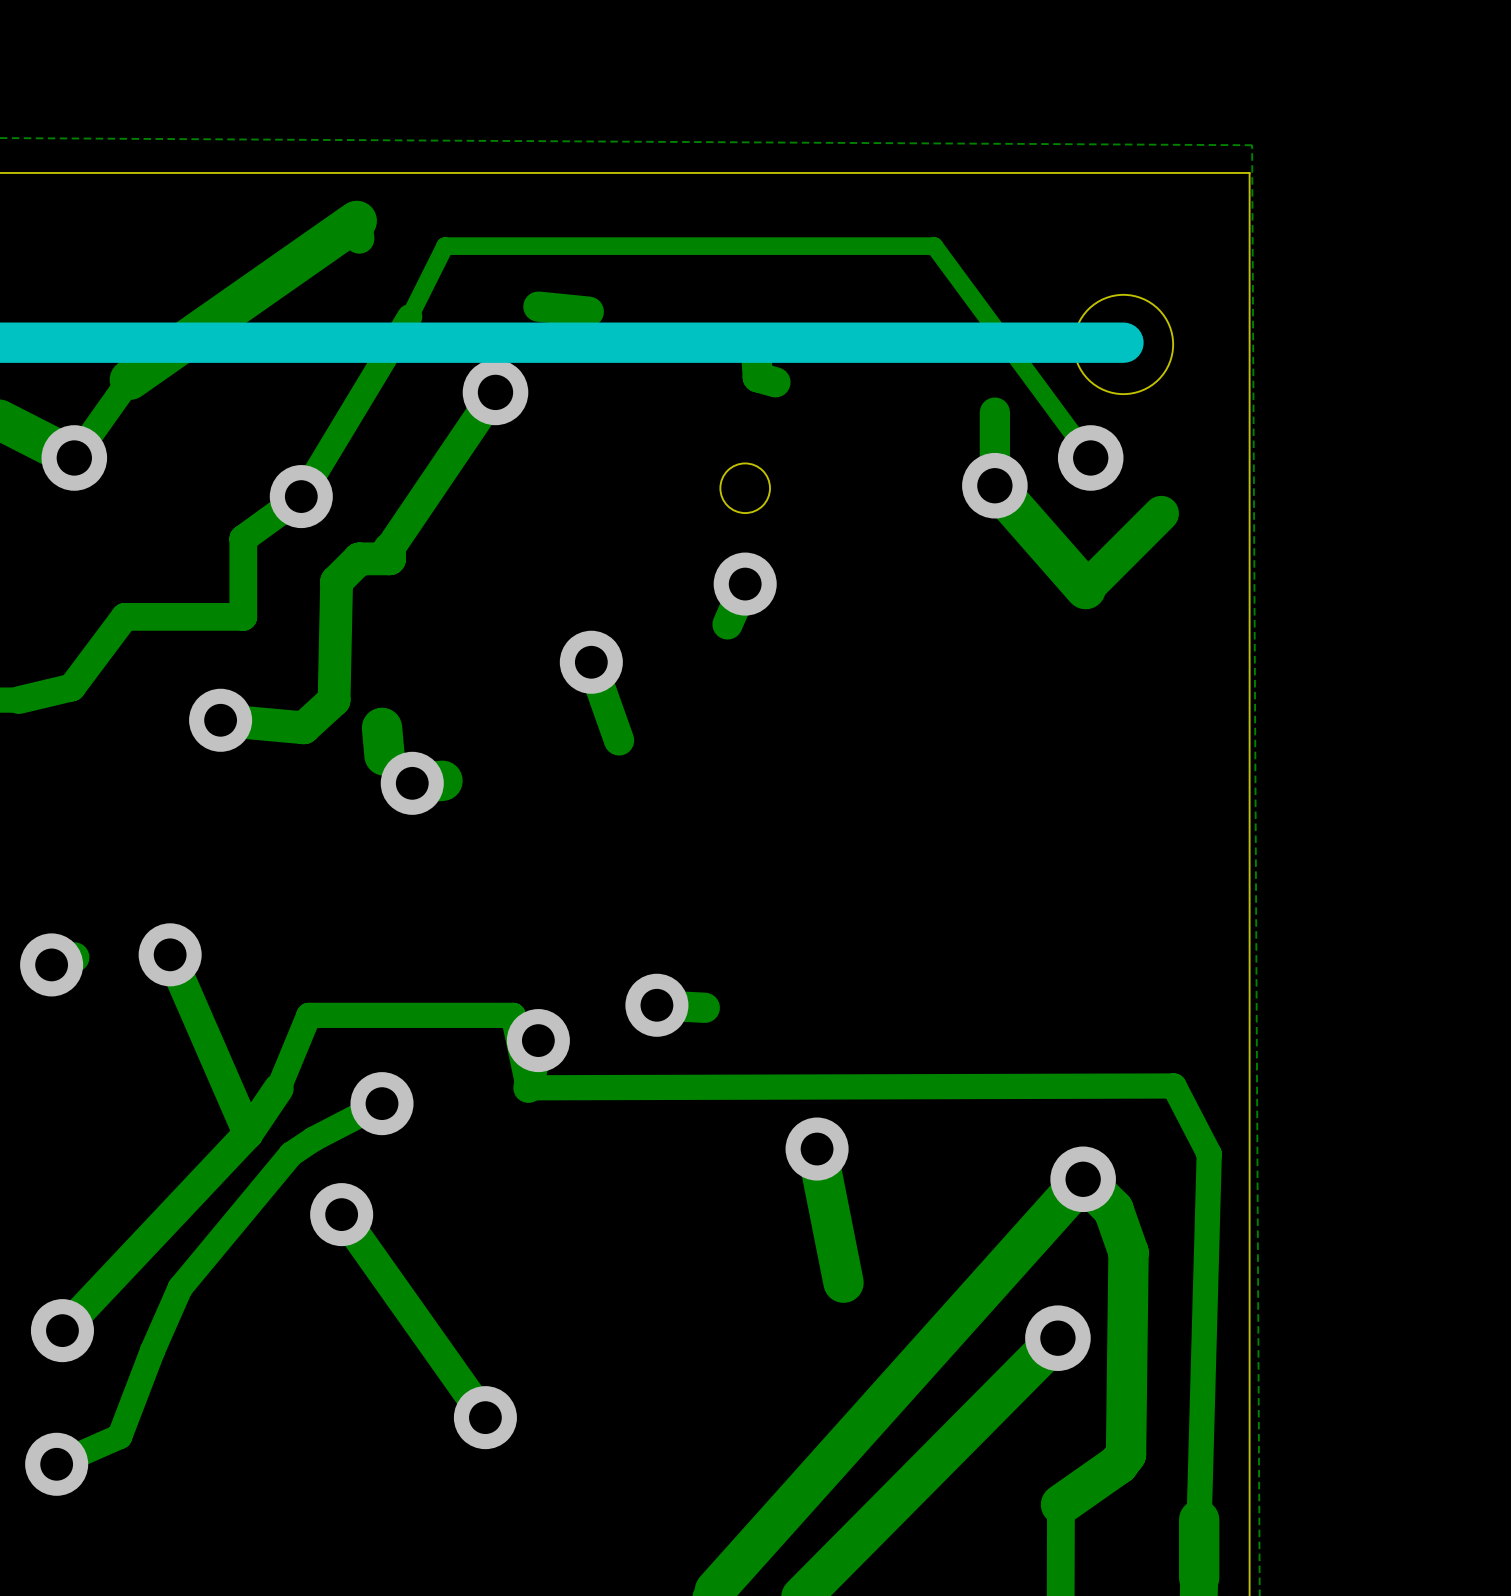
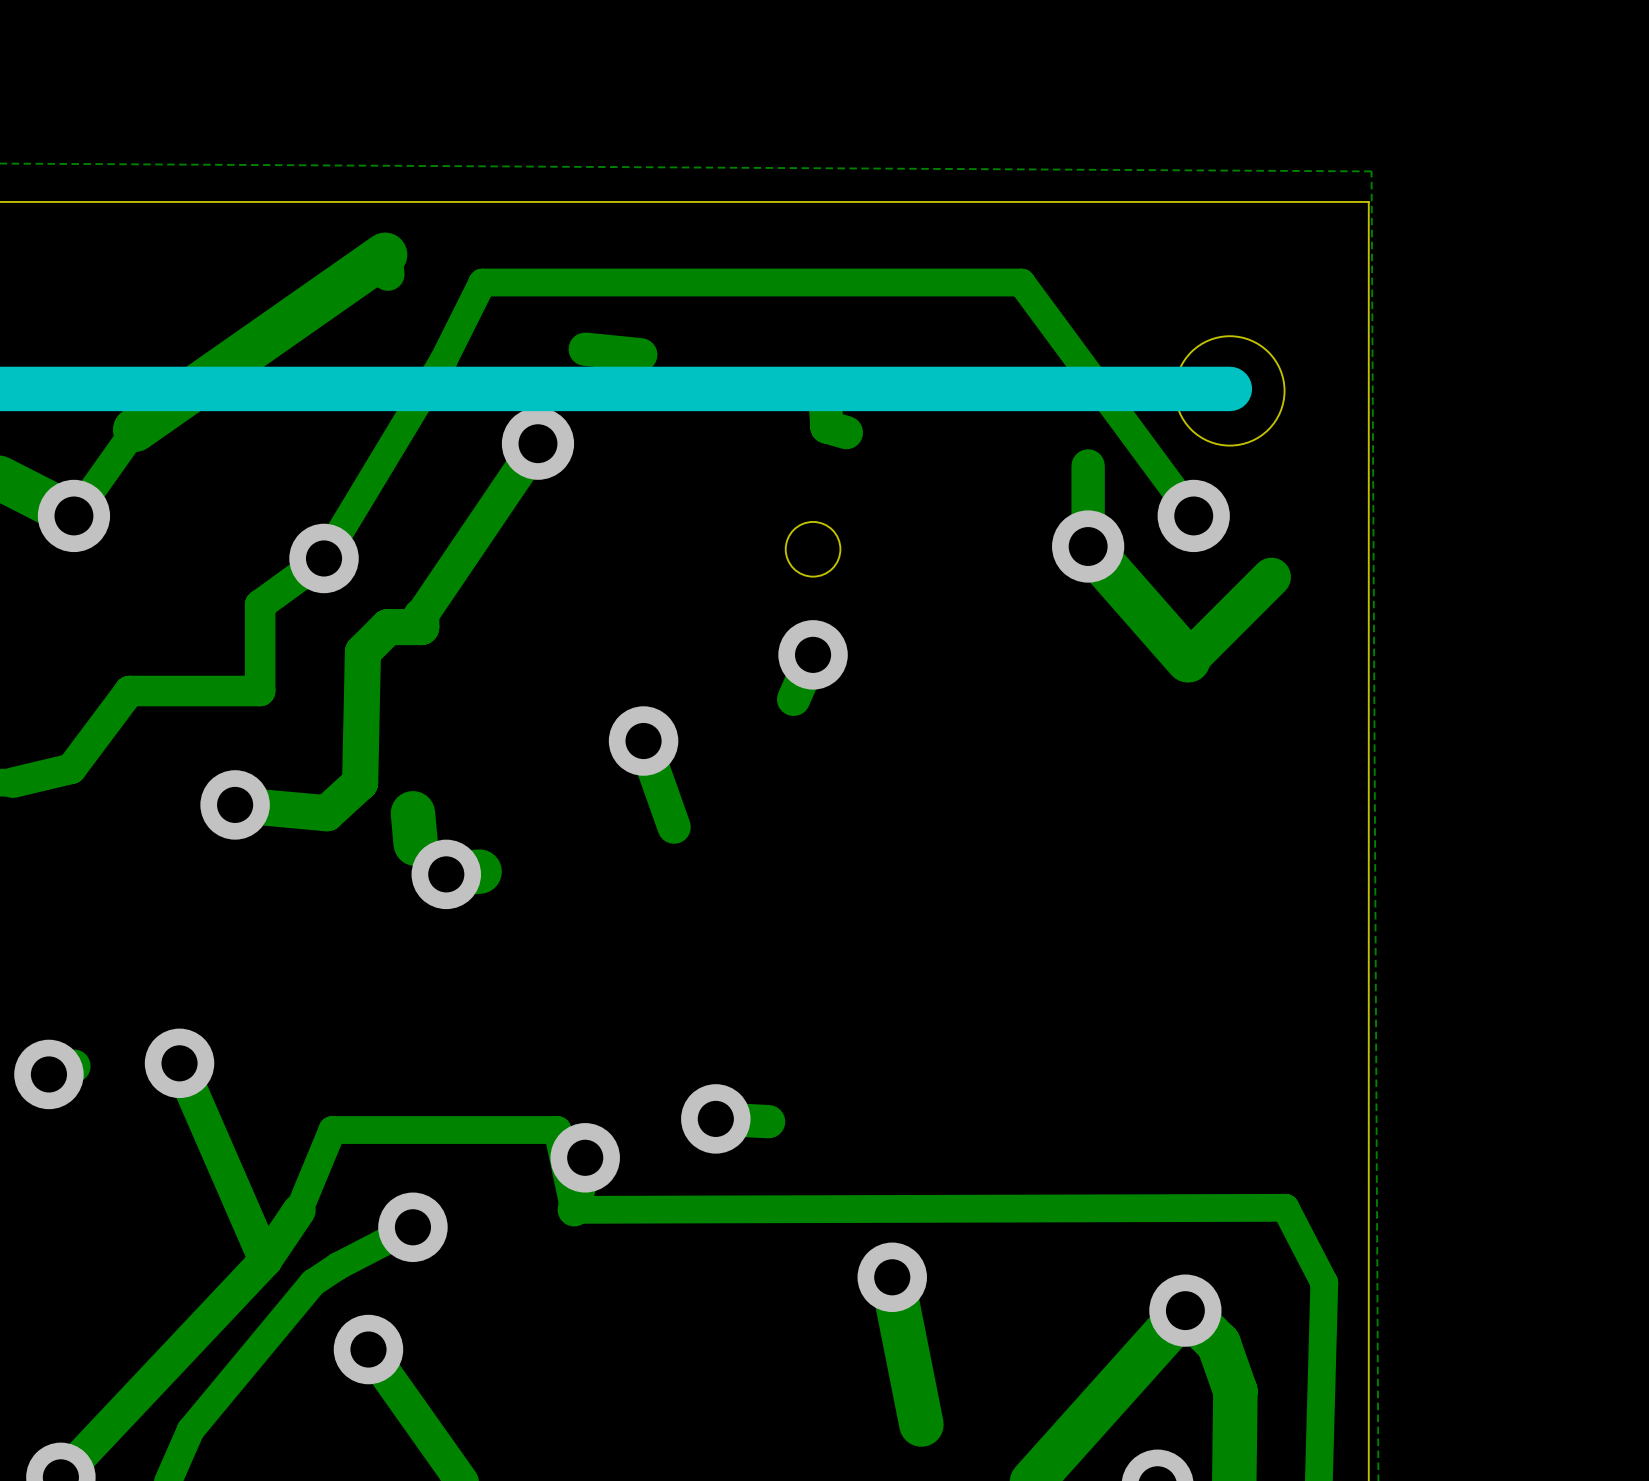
track width: thin (409, 316) (445, 246) (934, 246) (1090, 457) -> thick (443, 360) (482, 282) (1021, 282) (1193, 515)

